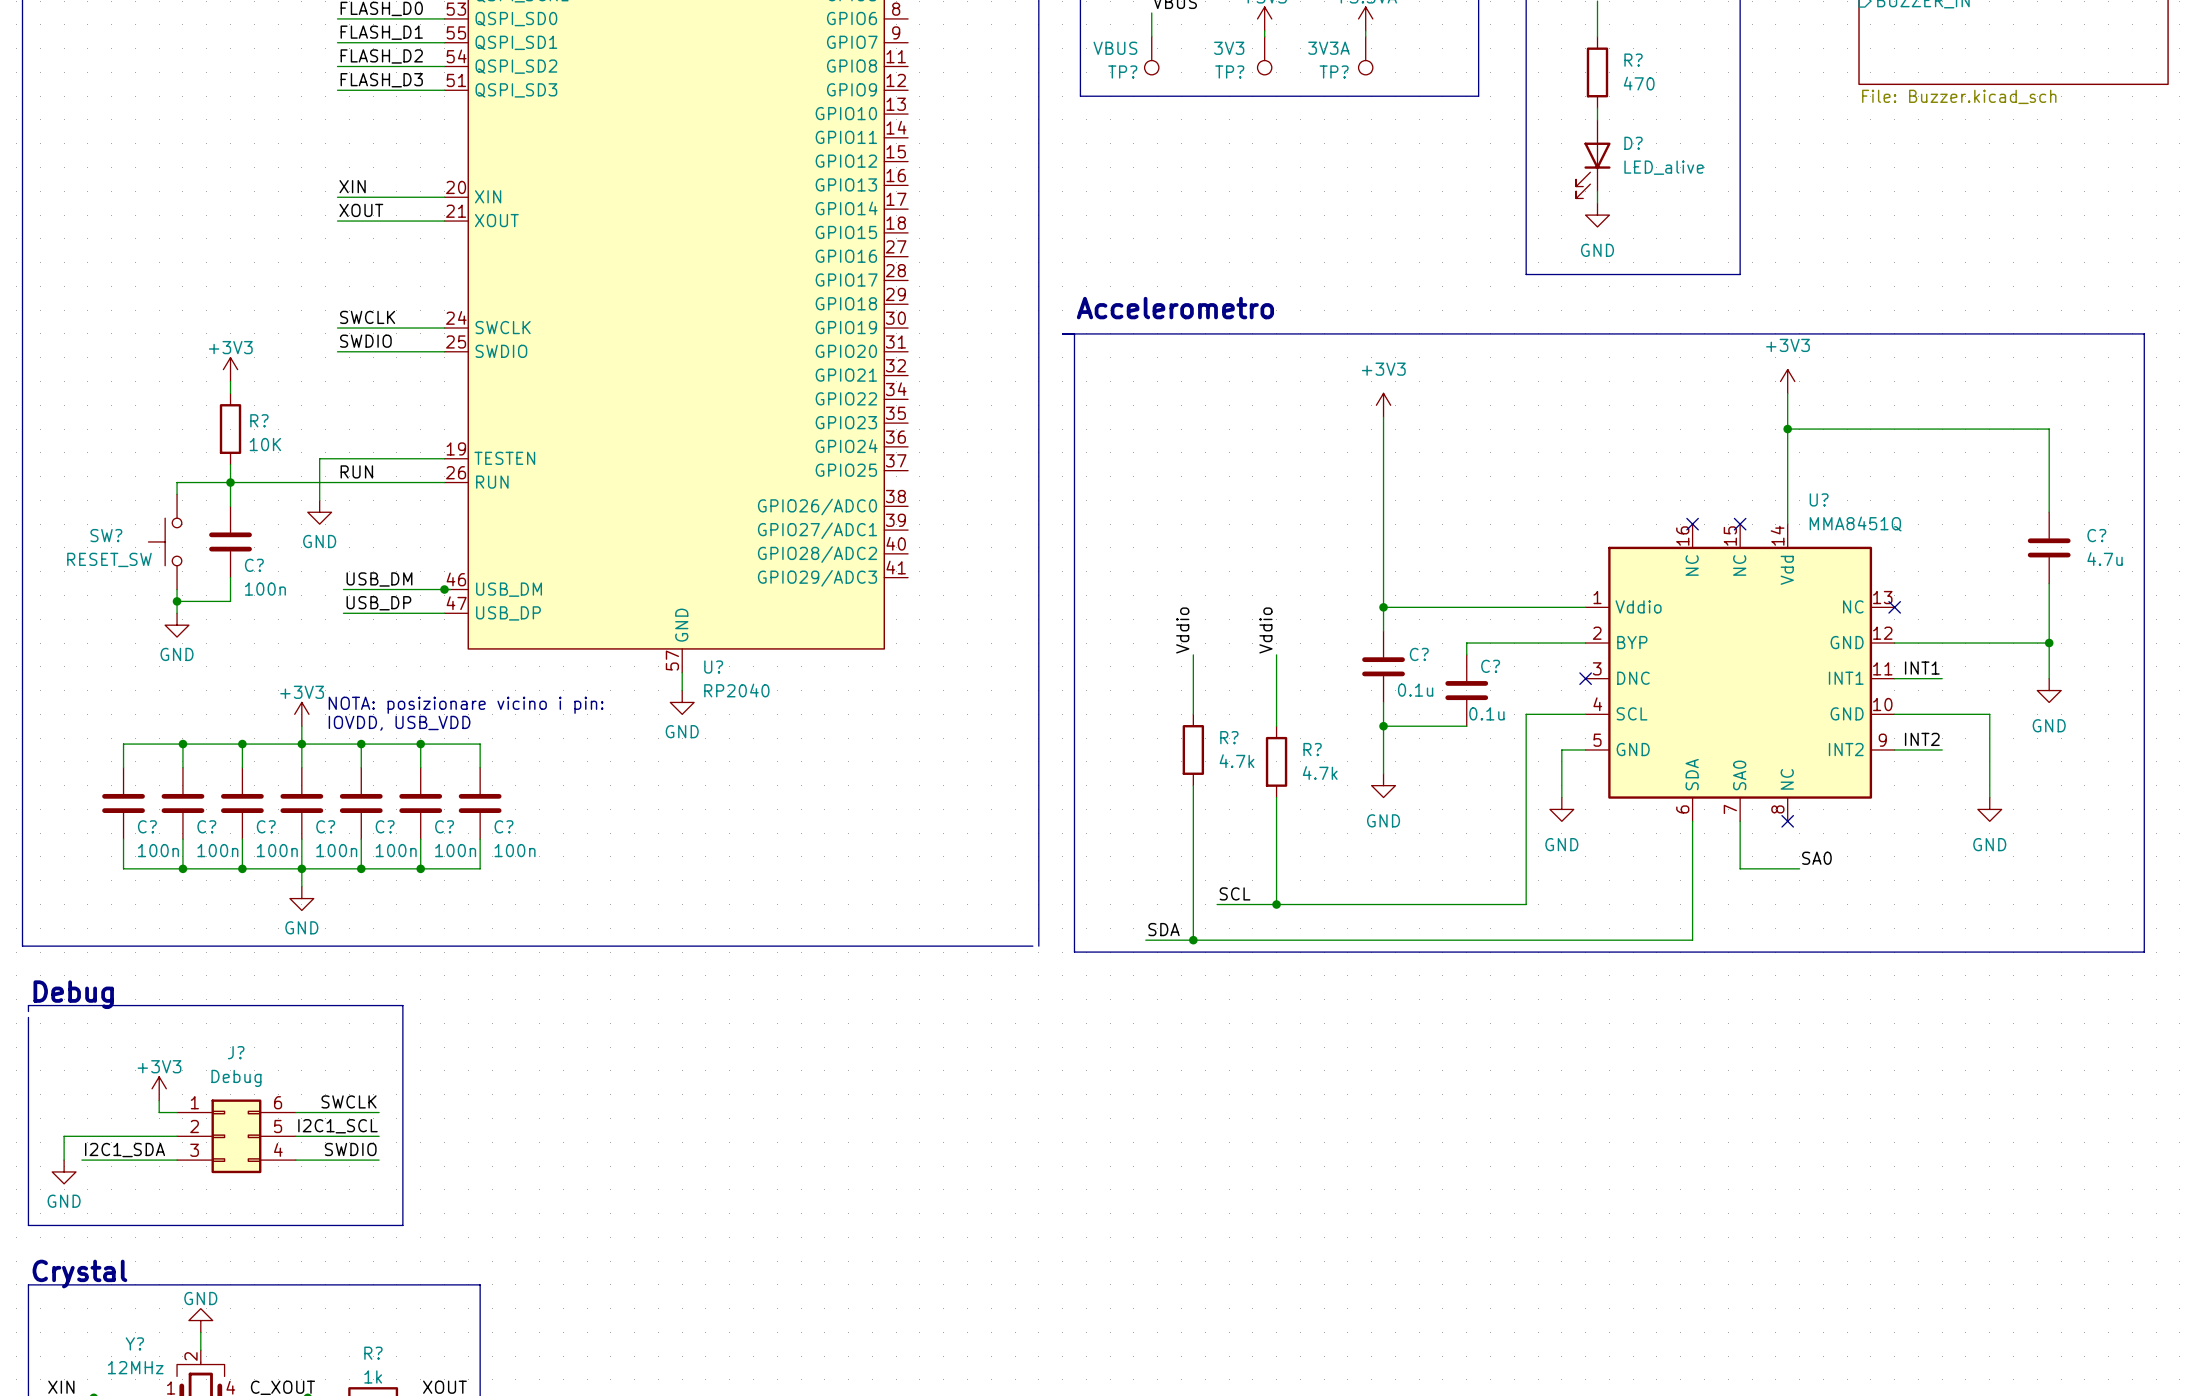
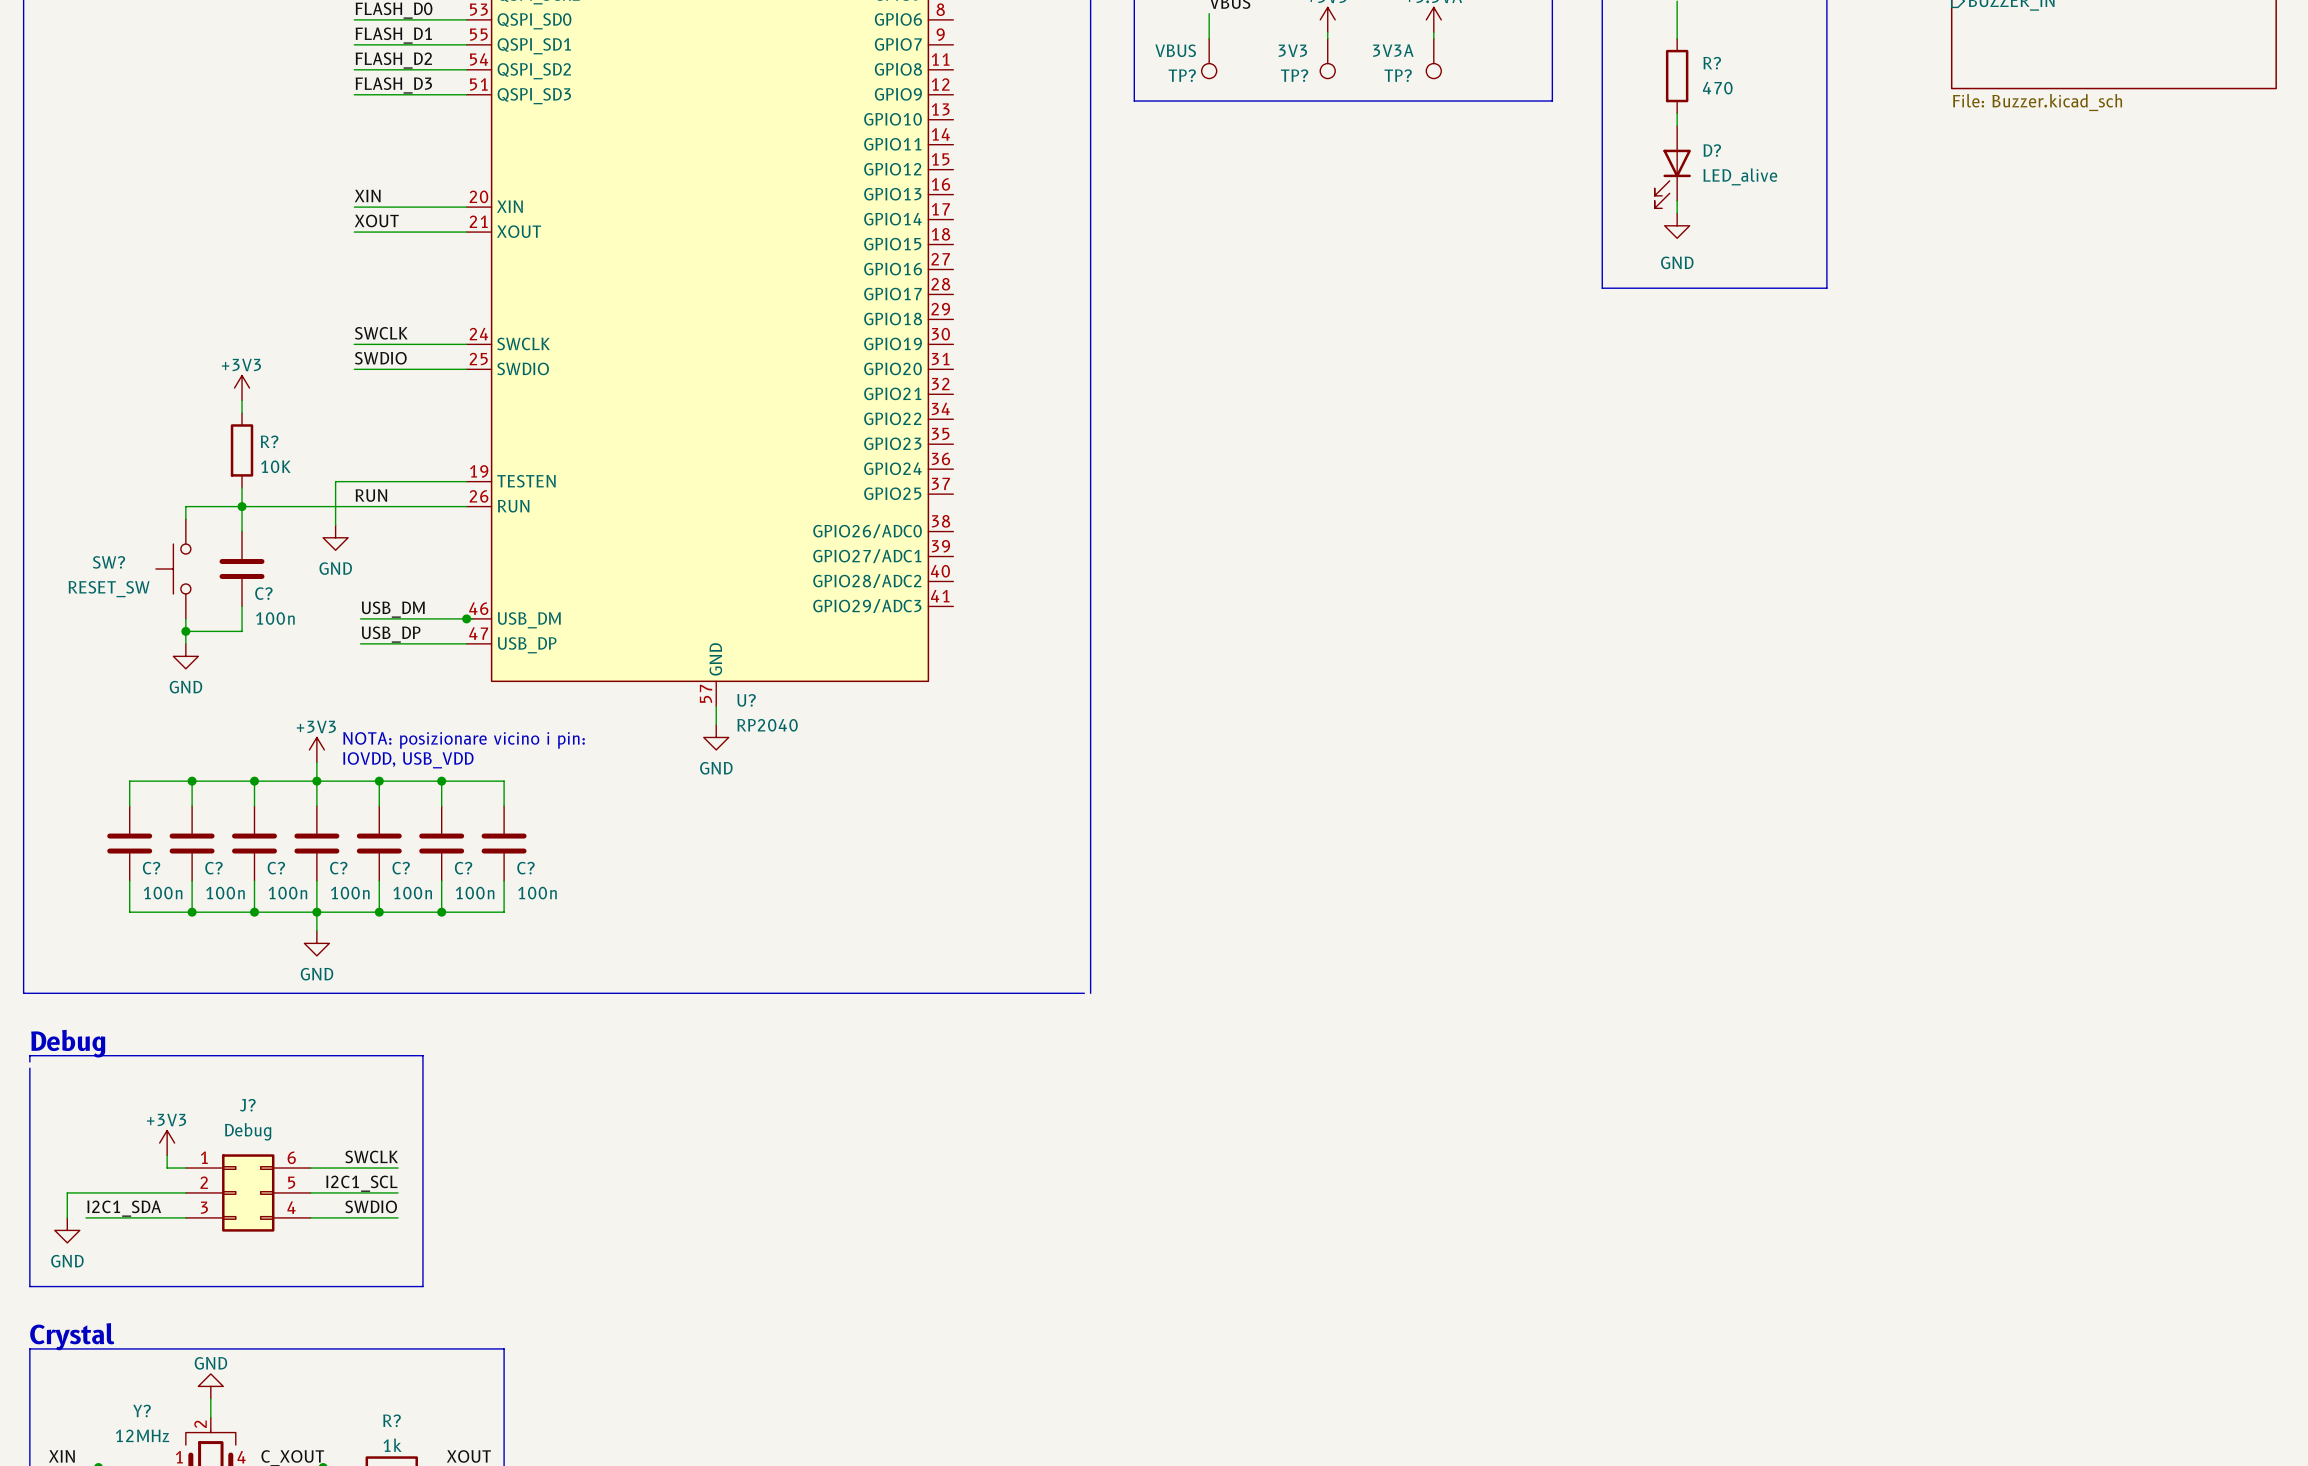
text: Accelerometro (1175, 308) -> none
line: (1062, 333) (2144, 333) (2144, 952) (1074, 952) (1074, 333) -> none
power symbol: +3V3 (1787, 381) -> none
wire: (1787, 393) (1787, 524) -> none
power symbol: +3V3 (1383, 405) -> none
wire: (1383, 417) (1383, 631) -> none
wire: (1787, 429) (2049, 429) (2049, 512) -> none
junction: (1787, 429) -> none
no-connect mark: (1692, 524) -> none
no-connect mark: (1740, 524) -> none
C?: 4.7u (2049, 547) -> none
wire: (2049, 583) (2049, 678) -> none
wire: (1383, 607) (1585, 607) -> none
junction: (1383, 607) -> none
no-connect mark: (1894, 607) -> none
label: Vddio (1182, 630) -> none
label: Vddio (1265, 630) -> none
wire: (1585, 643) (1466, 643) (1466, 654) -> none
wire: (1894, 643) (2049, 643) -> none
junction: (2049, 643) -> none
wire: (1193, 654) (1193, 714) -> none
wire: (1276, 654) (1276, 726) -> none
C?: 0.1u (1383, 666) -> none
label: INT1 (1922, 668) -> none
U?: MMA8451Q (1740, 672) -> none
no-connect mark: (1585, 678) -> none
wire: (1894, 678) (1942, 678) -> none
C?: 0.1u (1466, 690) -> none
power symbol: GND (2049, 690) -> none
wire: (1383, 702) (1383, 773) -> none
wire: (1585, 714) (1526, 714) (1526, 904) (1217, 904) -> none
wire: (1894, 714) (1989, 714) (1989, 797) -> none
wire: (1383, 726) (1466, 726) -> none
junction: (1383, 726) -> none
label: INT2 (1922, 739) -> none
R?: 4.7k (1193, 749) -> none
wire: (1585, 749) (1561, 749) (1561, 797) -> none
wire: (1894, 749) (1942, 749) -> none
R?: 4.7k (1276, 761) -> none
wire: (1193, 785) (1193, 940) -> none
power symbol: GND (1383, 785) -> none
wire: (1276, 797) (1276, 904) -> none
power symbol: GND (1561, 809) -> none
power symbol: GND (1989, 809) -> none
wire: (1692, 821) (1692, 940) (1145, 940) -> none
wire: (1740, 821) (1740, 868) (1799, 868) -> none
no-connect mark: (1787, 821) -> none
label: SA0 (1816, 858) -> none
label: SCL (1235, 893) -> none
junction: (1276, 904) -> none
label: SDA (1164, 929) -> none
junction: (1193, 940) -> none

